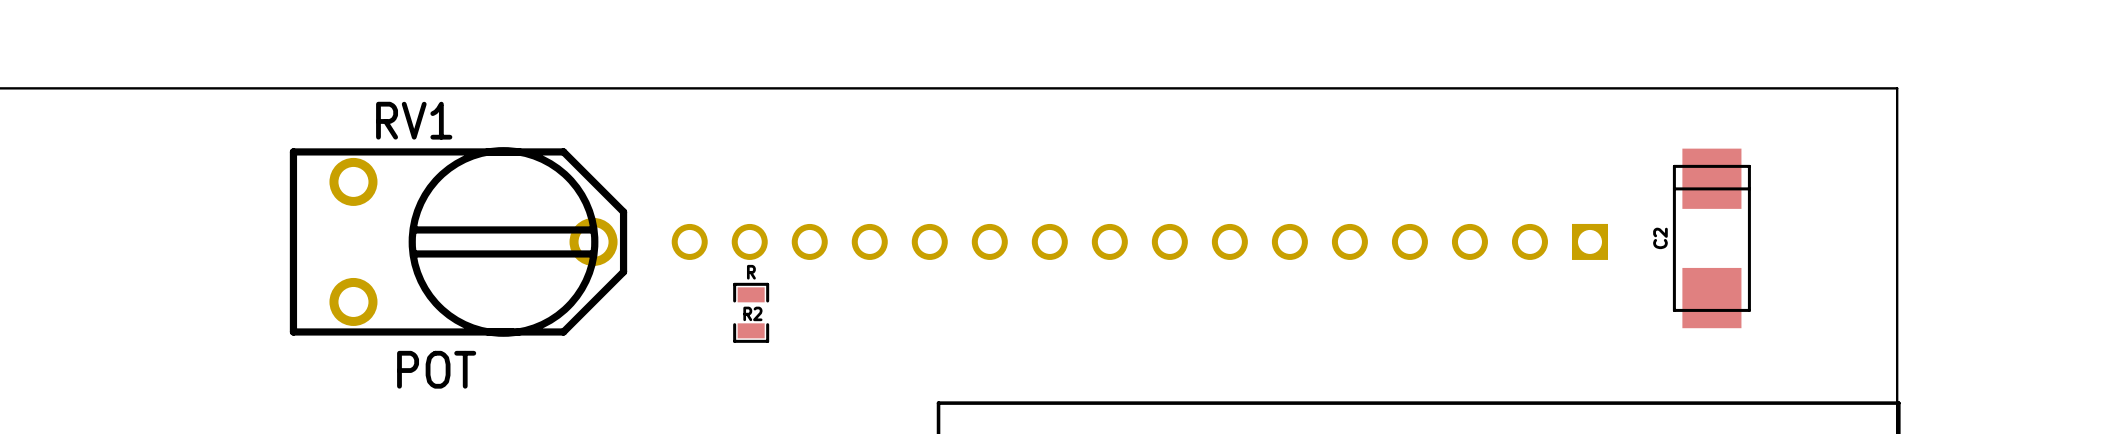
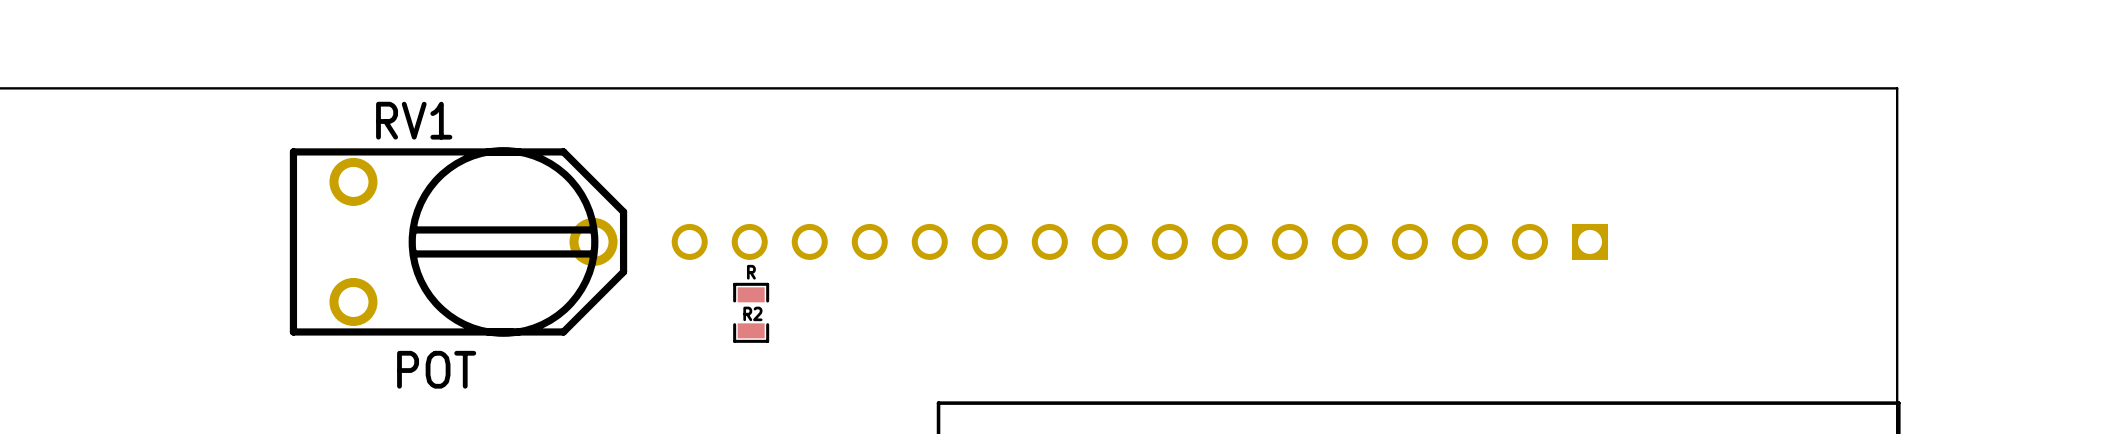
C2: (1711, 238) -> none

